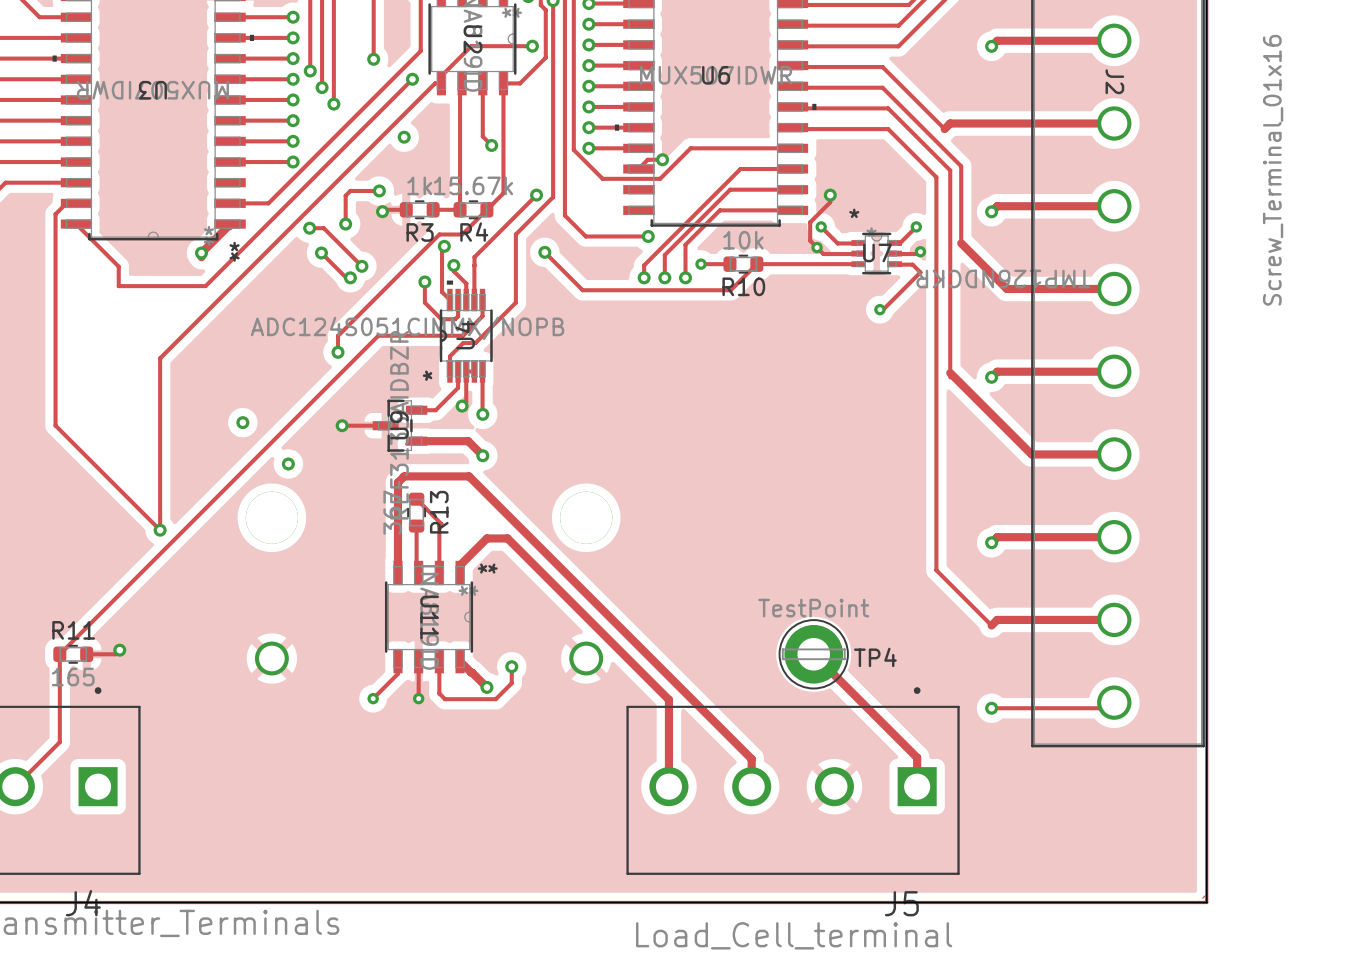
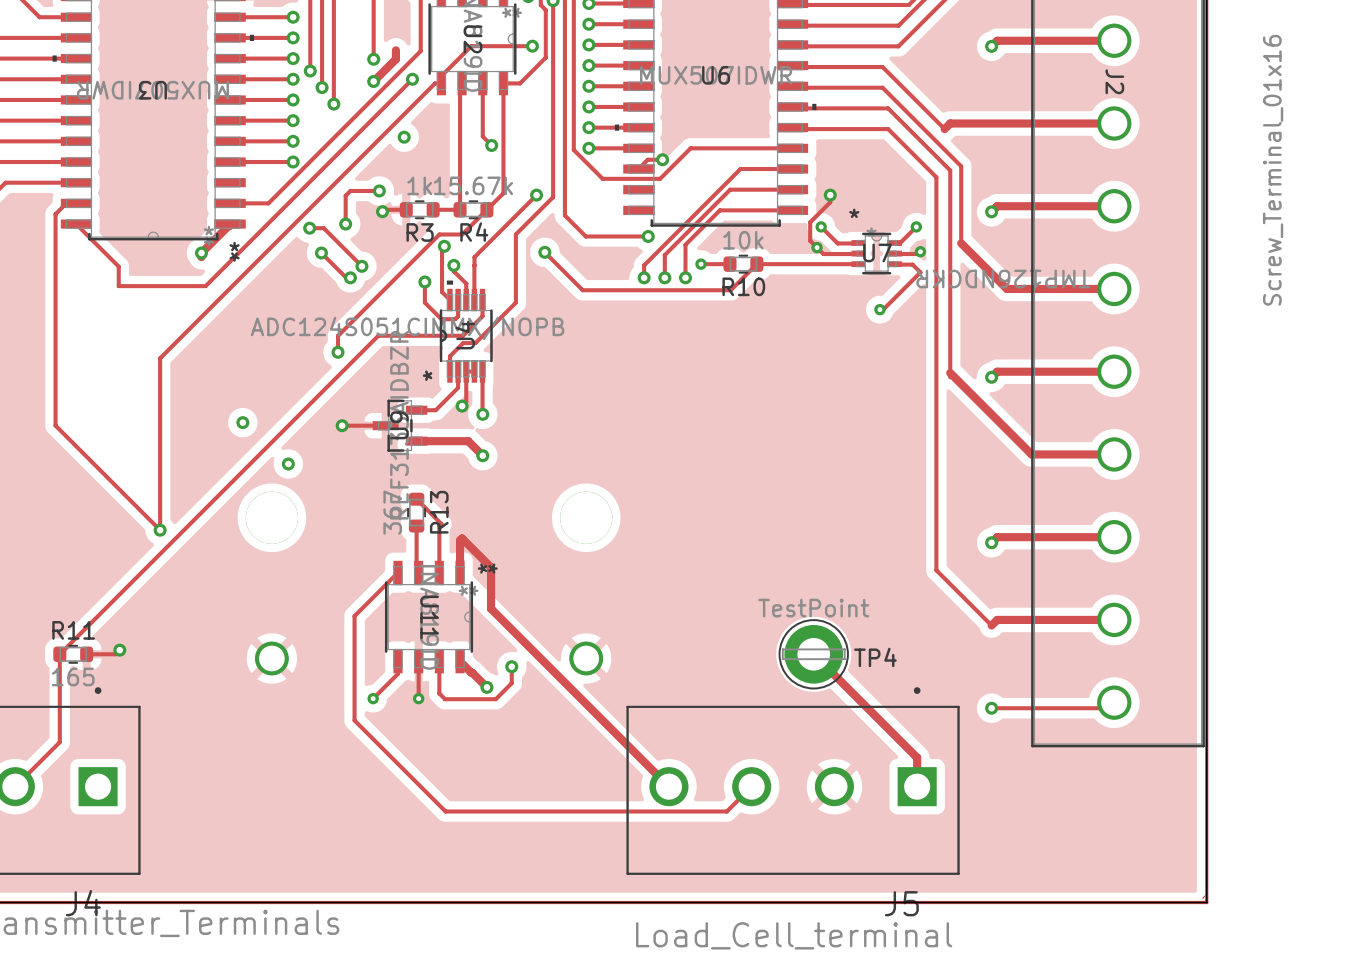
track: none -> (395, 50) (395, 59) (373, 81)
via: none -> (373, 81)
track: (460, 565) (486, 538) (507, 538) (668, 699) (668, 786) -> (460, 565) (460, 540) (462, 538) (491, 567) (491, 608) (668, 786)
track: (397, 572) (397, 482) (404, 476) (469, 476) (751, 759) (751, 786) -> (397, 572) (354, 616) (354, 720) (445, 811) (726, 811) (751, 786)

